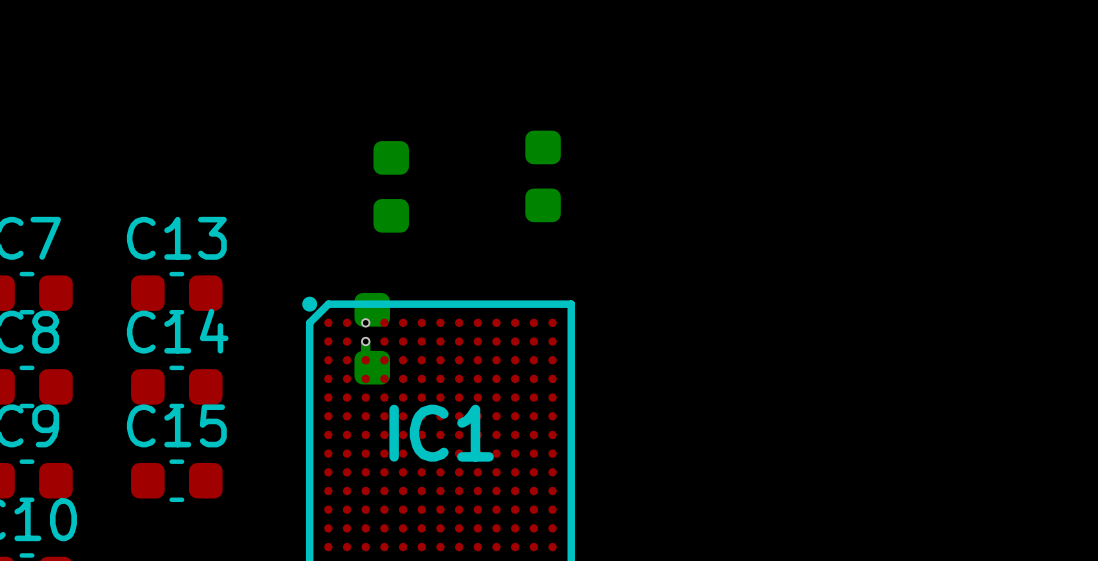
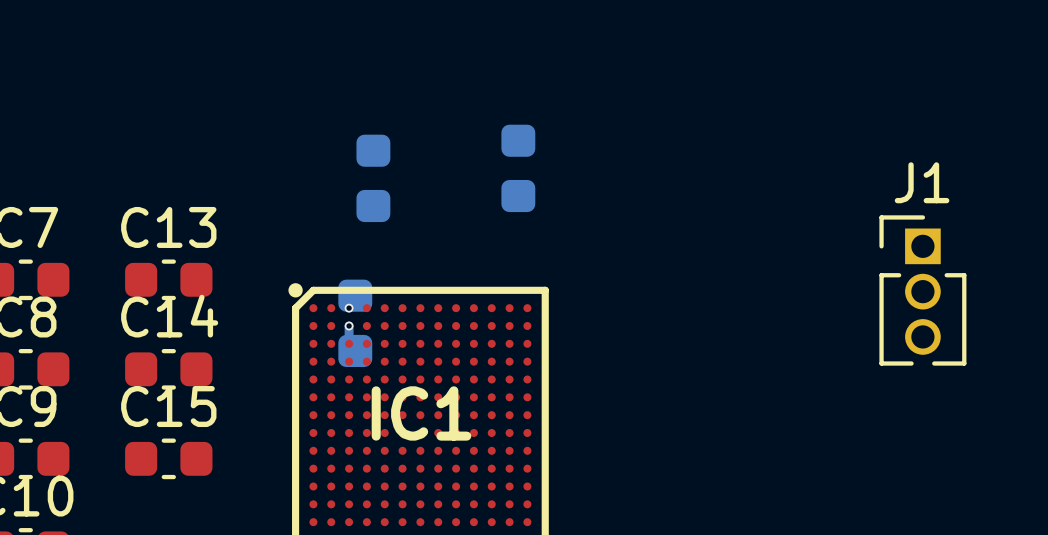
J1: none -> (922, 290)

